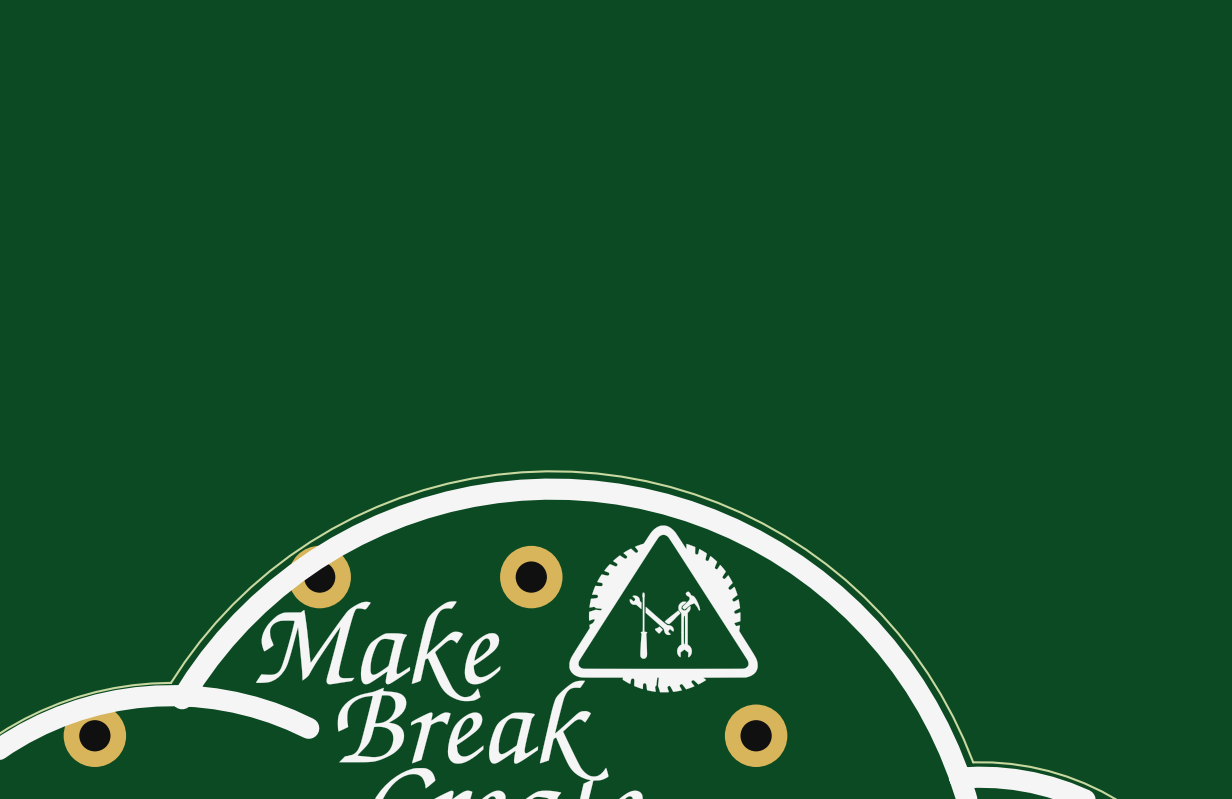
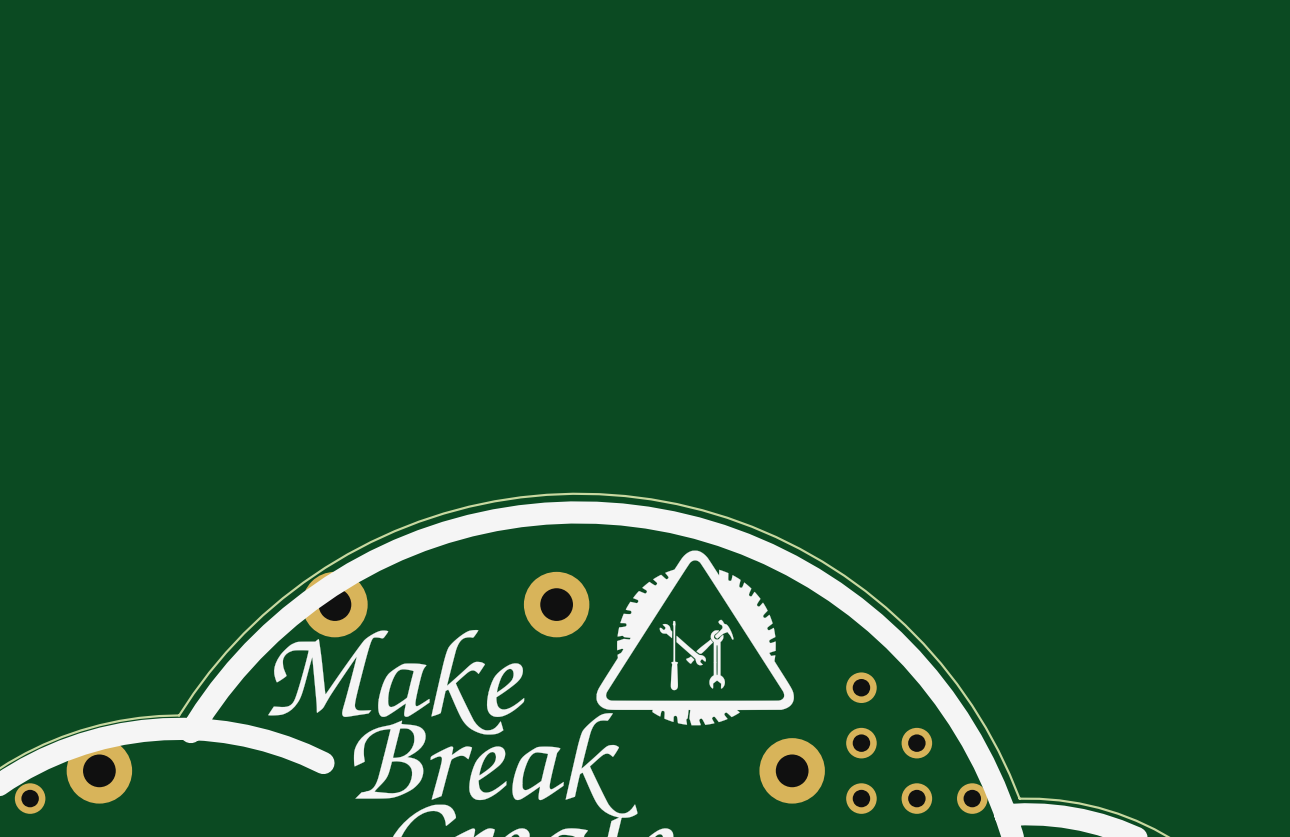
part: none -> (861, 687)
part: none -> (861, 743)
part: none -> (916, 743)
part: none -> (30, 798)
part: none -> (861, 798)
part: none -> (916, 798)
part: none -> (972, 798)

